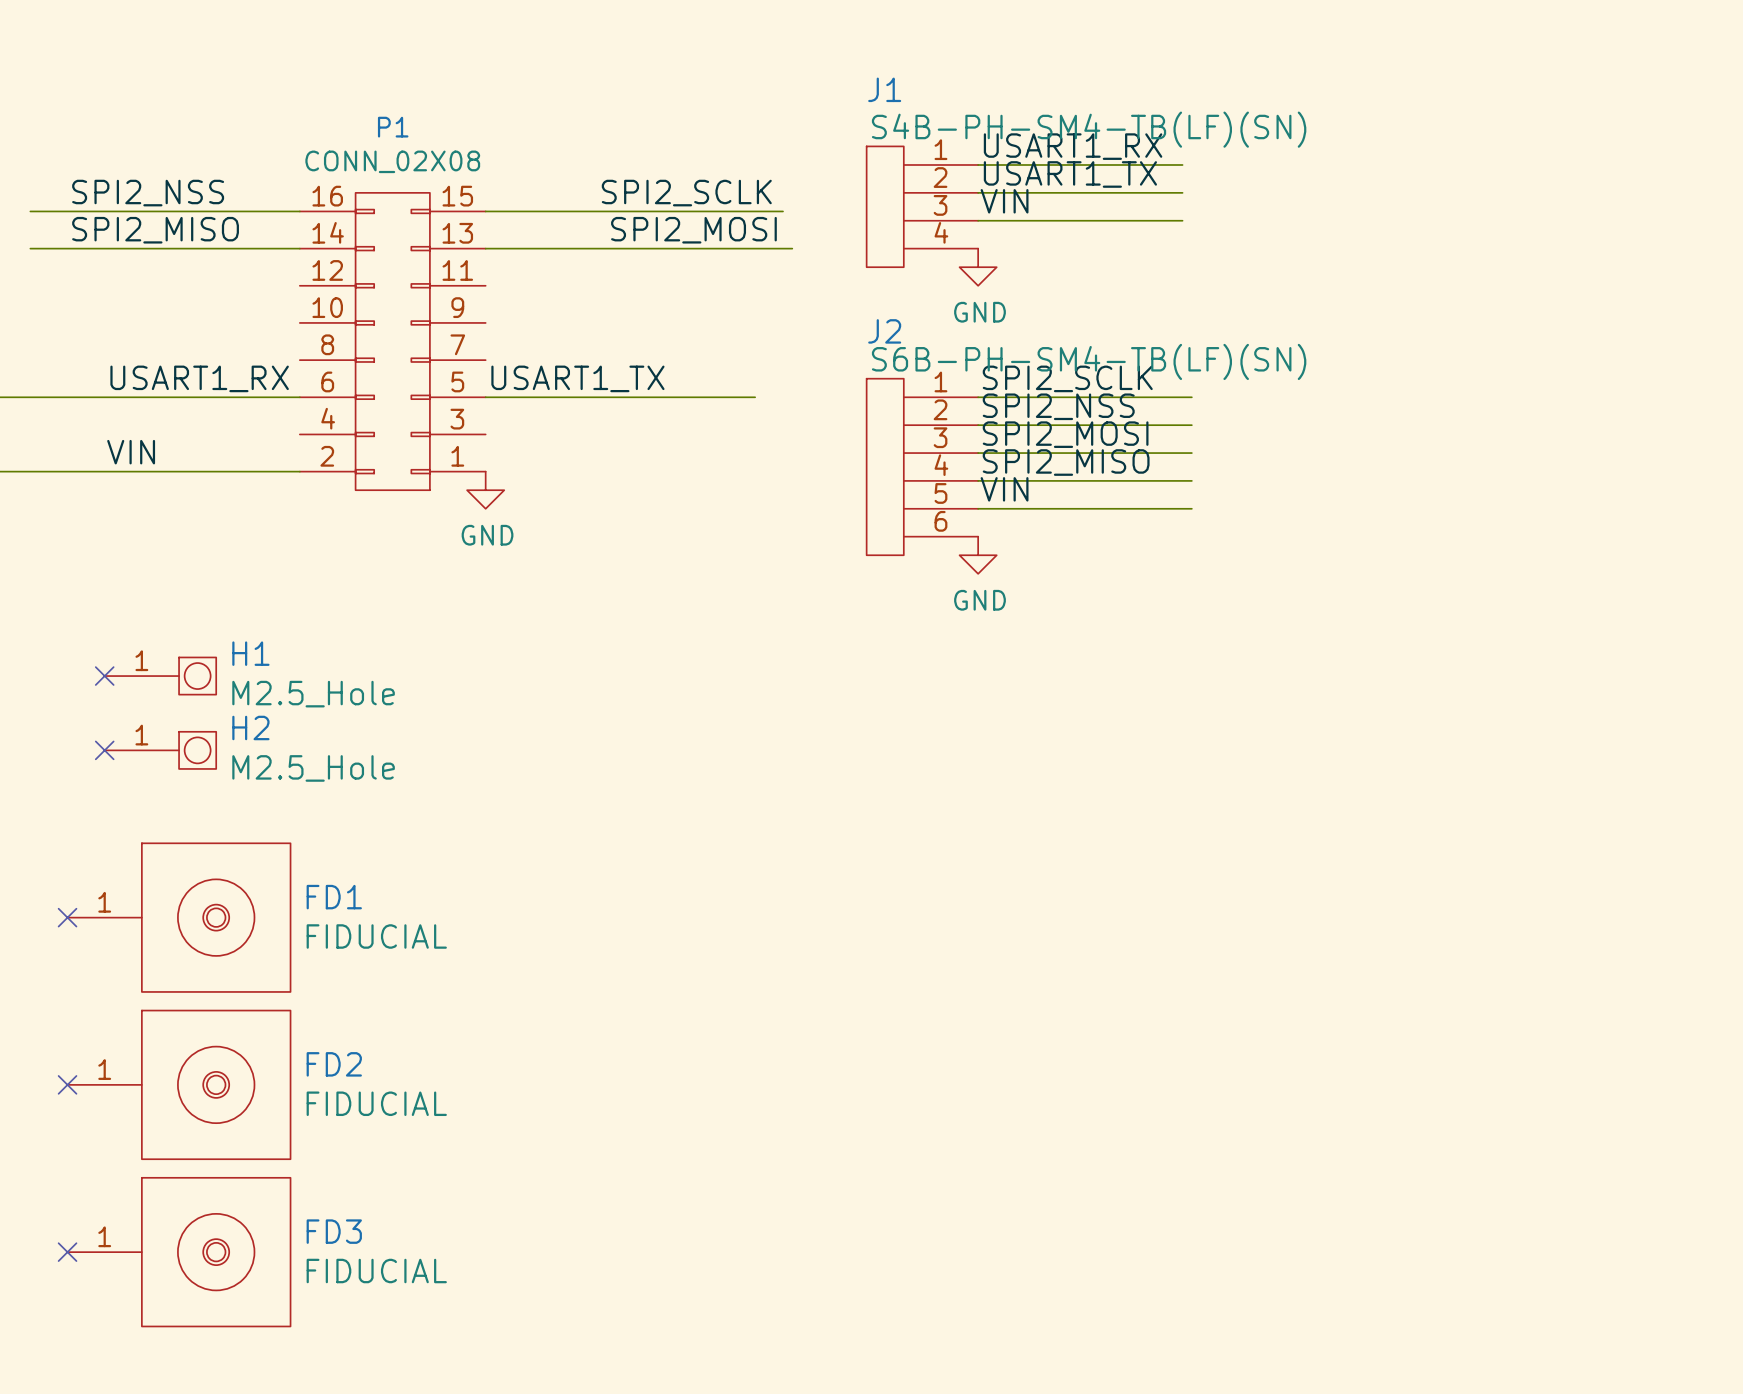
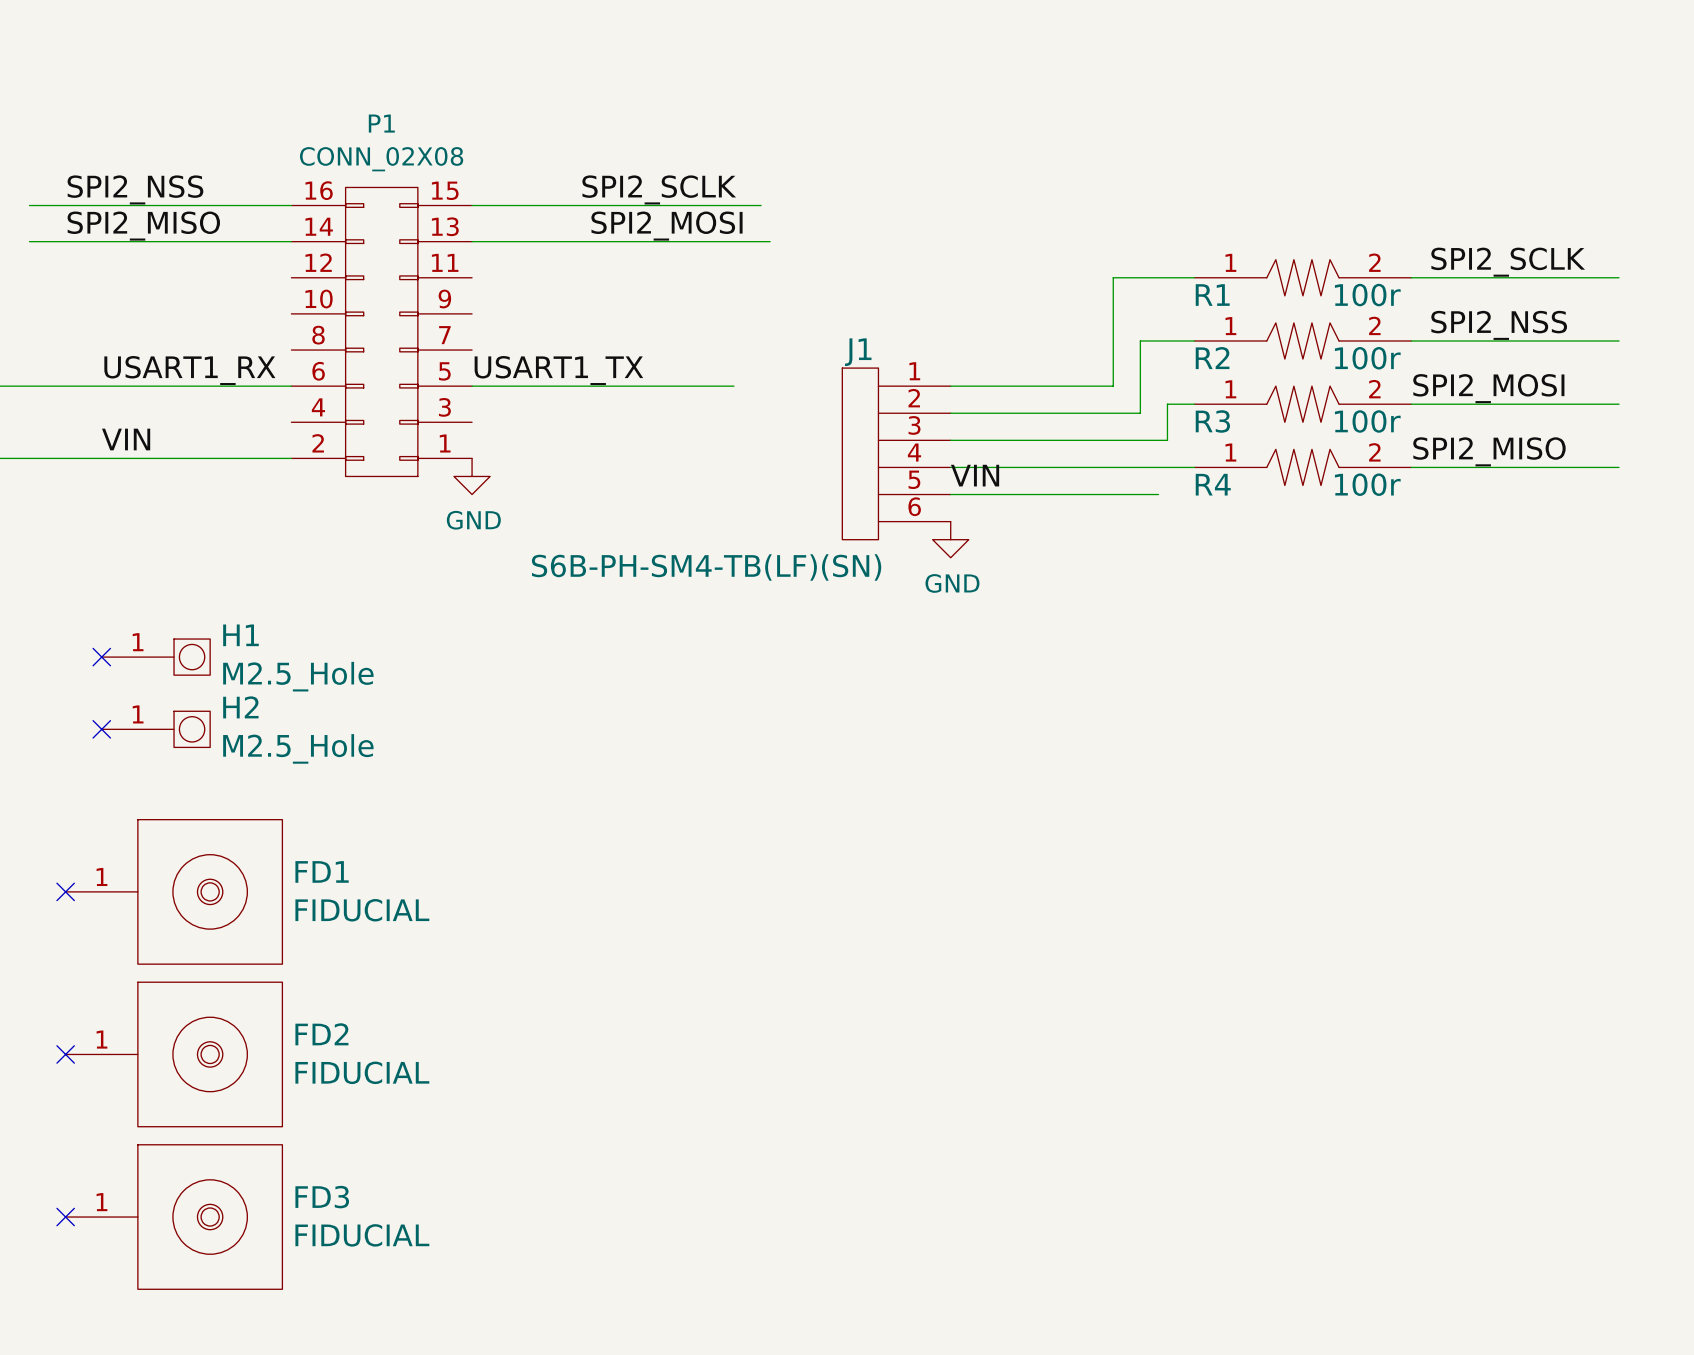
label: USART1_RX (1073, 146) -> none
wire: (978, 164) (1182, 164) -> none
label: USART1_TX (1070, 174) -> none
wire: (978, 192) (1182, 192) -> none
label: VIN (1004, 201) -> none
J1: S4B-PH-SM4-TB(LF)(SN) (922, 206) -> none
wire: (978, 220) (1182, 220) -> none
power symbol: GND (978, 267) -> none
label: none -> SPI2_SCLK (1508, 262)
R1: none -> (1302, 277)
wire: none -> (1411, 277) (1619, 277)
J2 name: J2 (884, 331) -> J1 (858, 352)
label: none -> SPI2_NSS (1499, 325)
R2: none -> (1302, 340)
wire: none -> (1411, 340) (1619, 340)
J2 value position: S6B-PH-SM4-TB(LF)(SN) (1089, 361) -> S6B-PH-SM4-TB(LF)(SN) (706, 567)
label: SPI2_SCLK (1067, 378) -> none
wire: (1145, 397) (1191, 397) -> (1113, 386) (1113, 277) (1194, 277)
label: none -> SPI2_MOSI (1488, 388)
label: SPI2_NSS (1058, 406) -> none
wire: none -> (1194, 404) (1167, 404) (1167, 440) (1158, 440)
R3: none -> (1302, 404)
wire: none -> (1411, 404) (1619, 404)
wire: (1173, 425) (1191, 425) -> (1140, 413) (1140, 340) (1194, 340)
label: SPI2_MOSI (1065, 434) -> none
label: SPI2_MISO (1066, 462) -> none
label: none -> SPI2_MISO (1489, 451)
wire: none -> (1158, 467) (1194, 467)
R4: none -> (1302, 467)
wire: none -> (1411, 467) (1619, 467)

